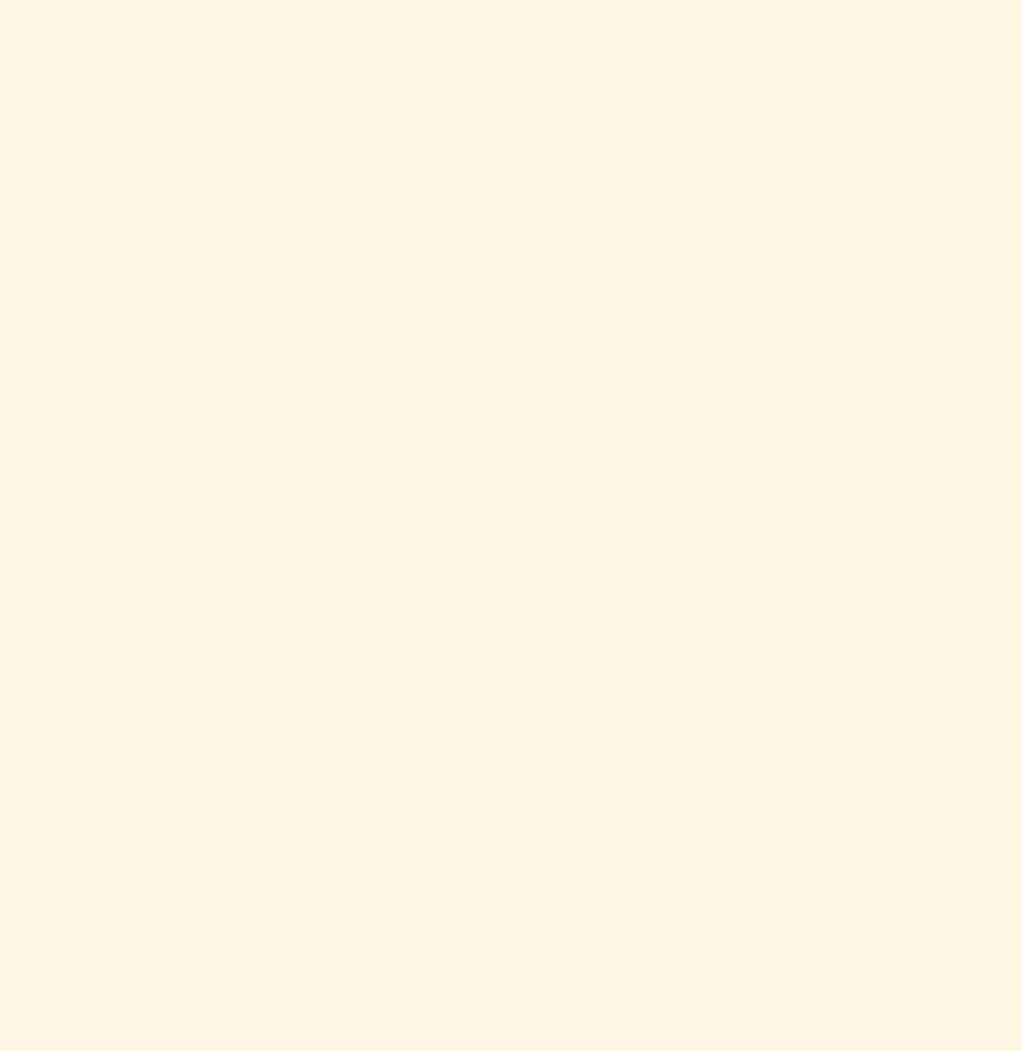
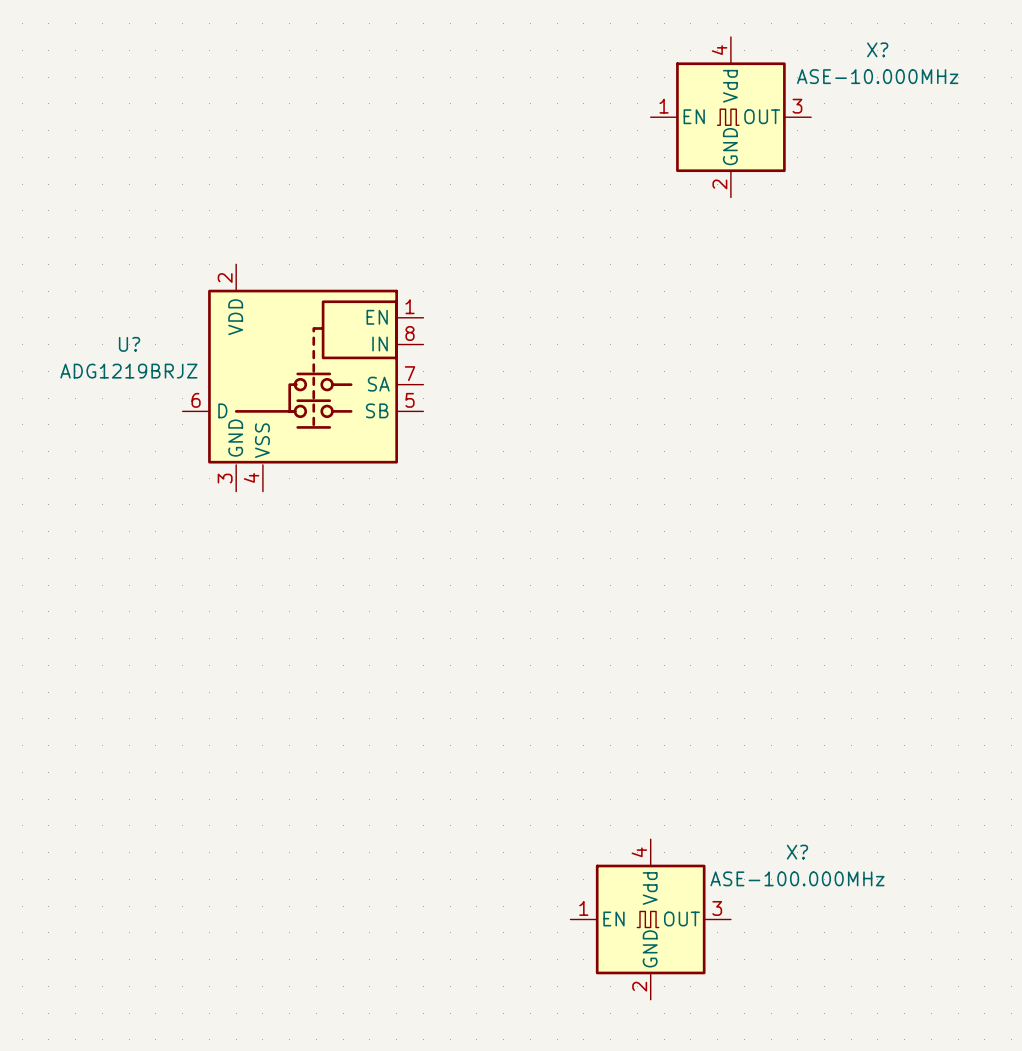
X?: none -> ASE-10.000MHz (730, 117)
U?: none -> ADG1219BRJZ (303, 377)
X?: none -> ASE-100.000MHz (650, 919)

